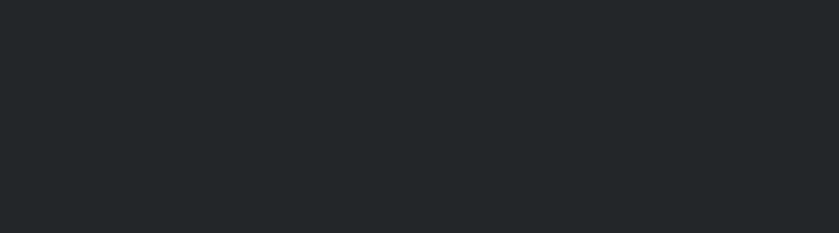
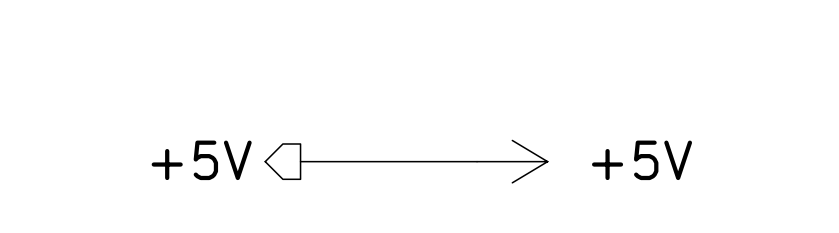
hierarchical label: none -> +5V (201, 160)
wire: none -> (300, 161) (477, 161)
power symbol: none -> +5V (512, 161)

